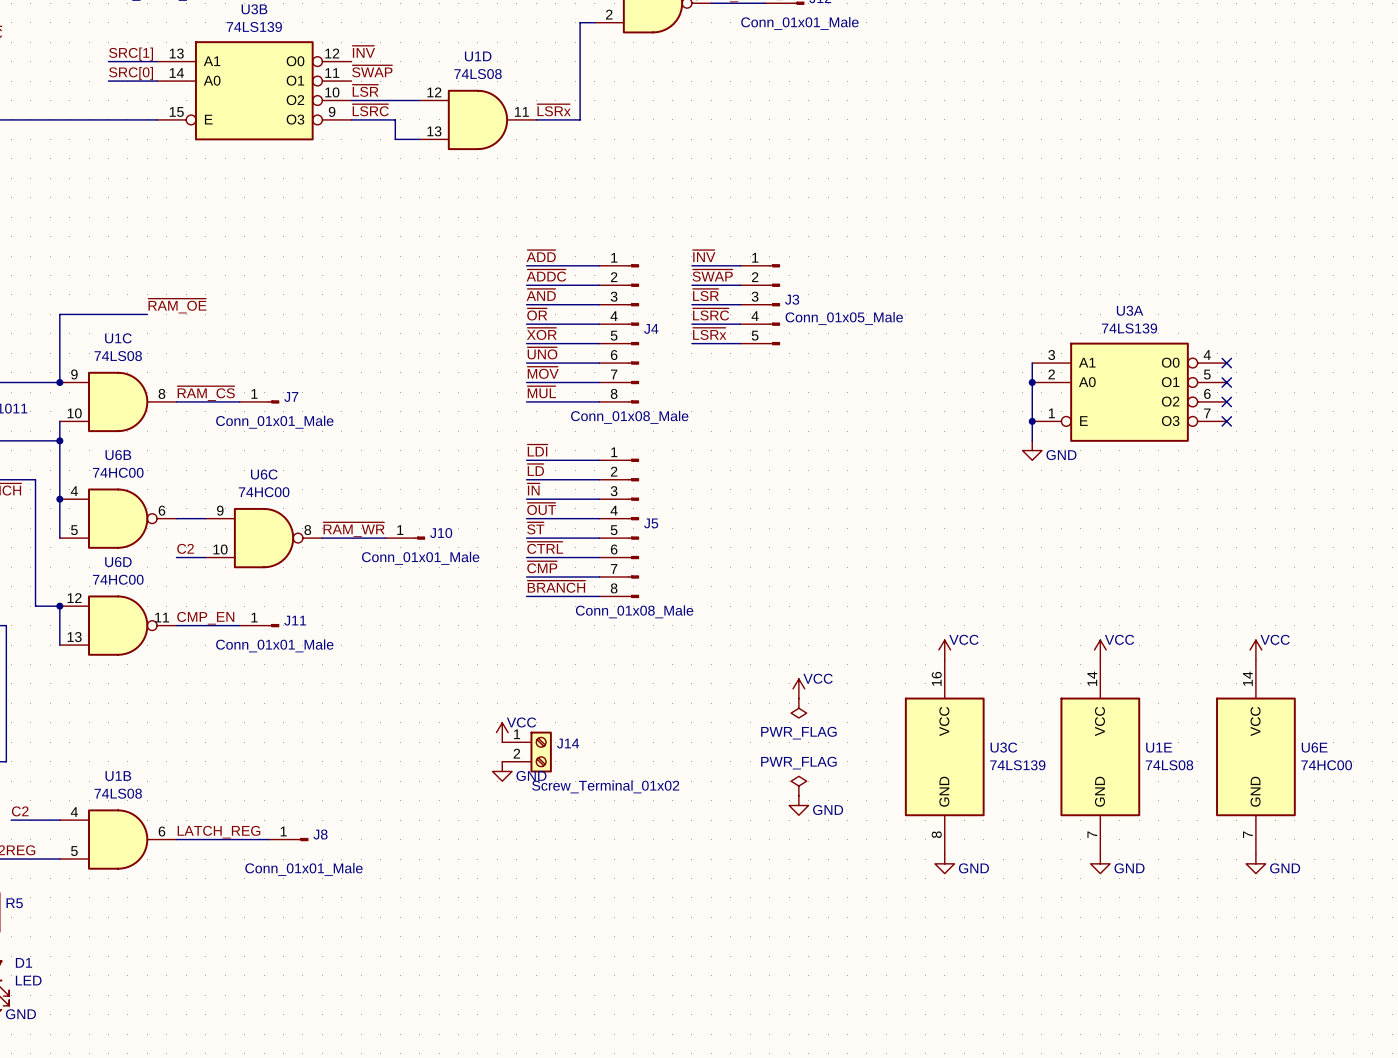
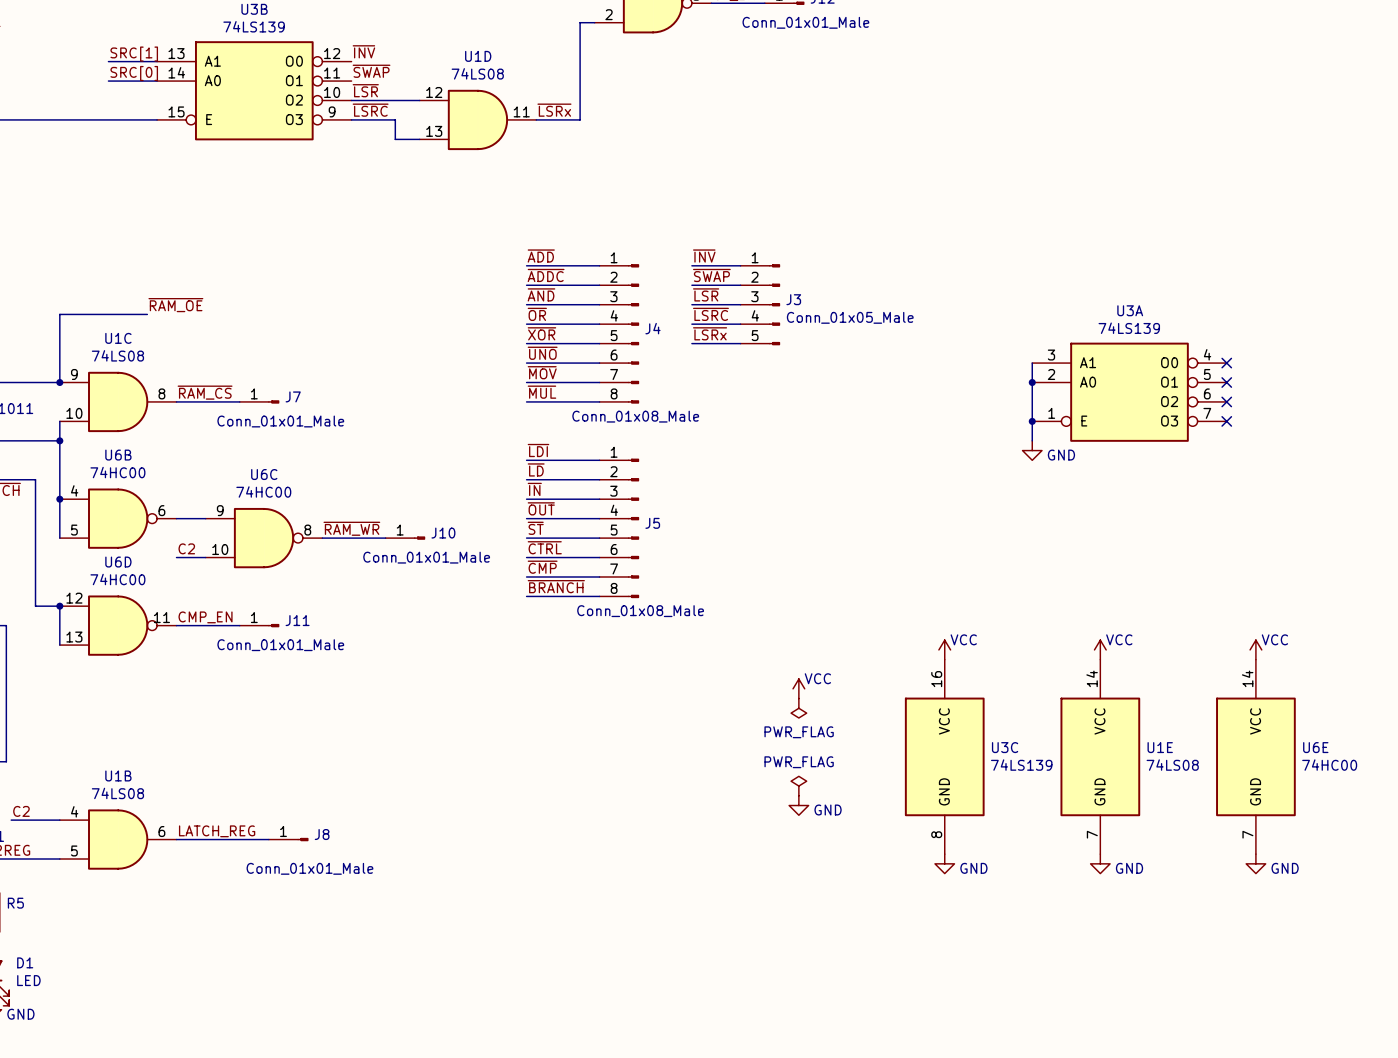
power symbol: VCC (502, 732) -> none
J14: Screw_Terminal_01x02 (527, 752) -> none
power symbol: GND (502, 771) -> none

